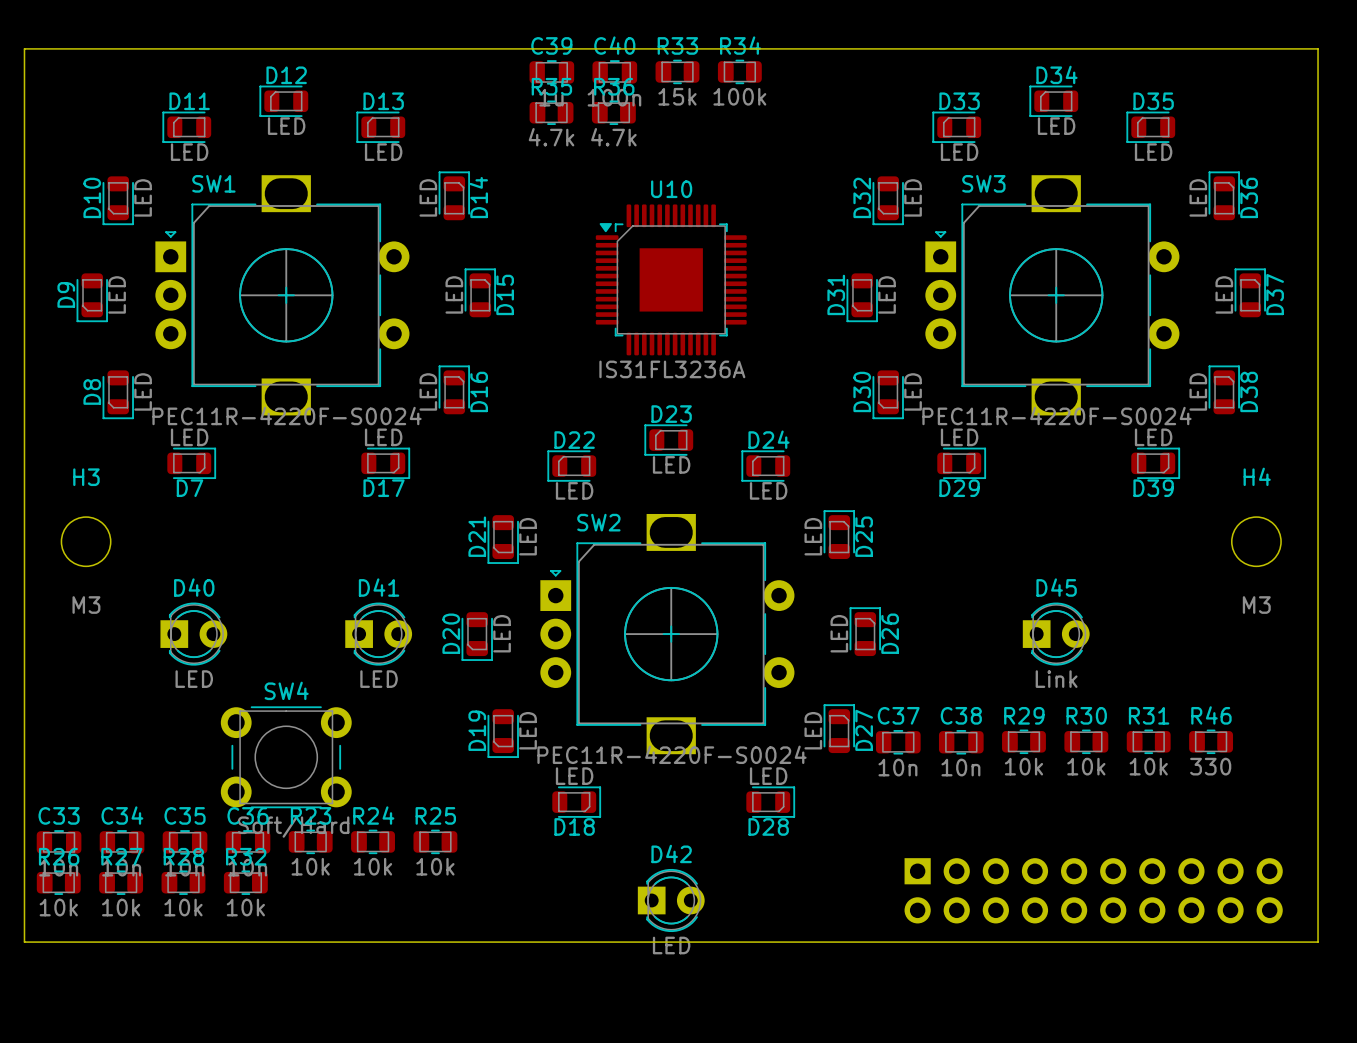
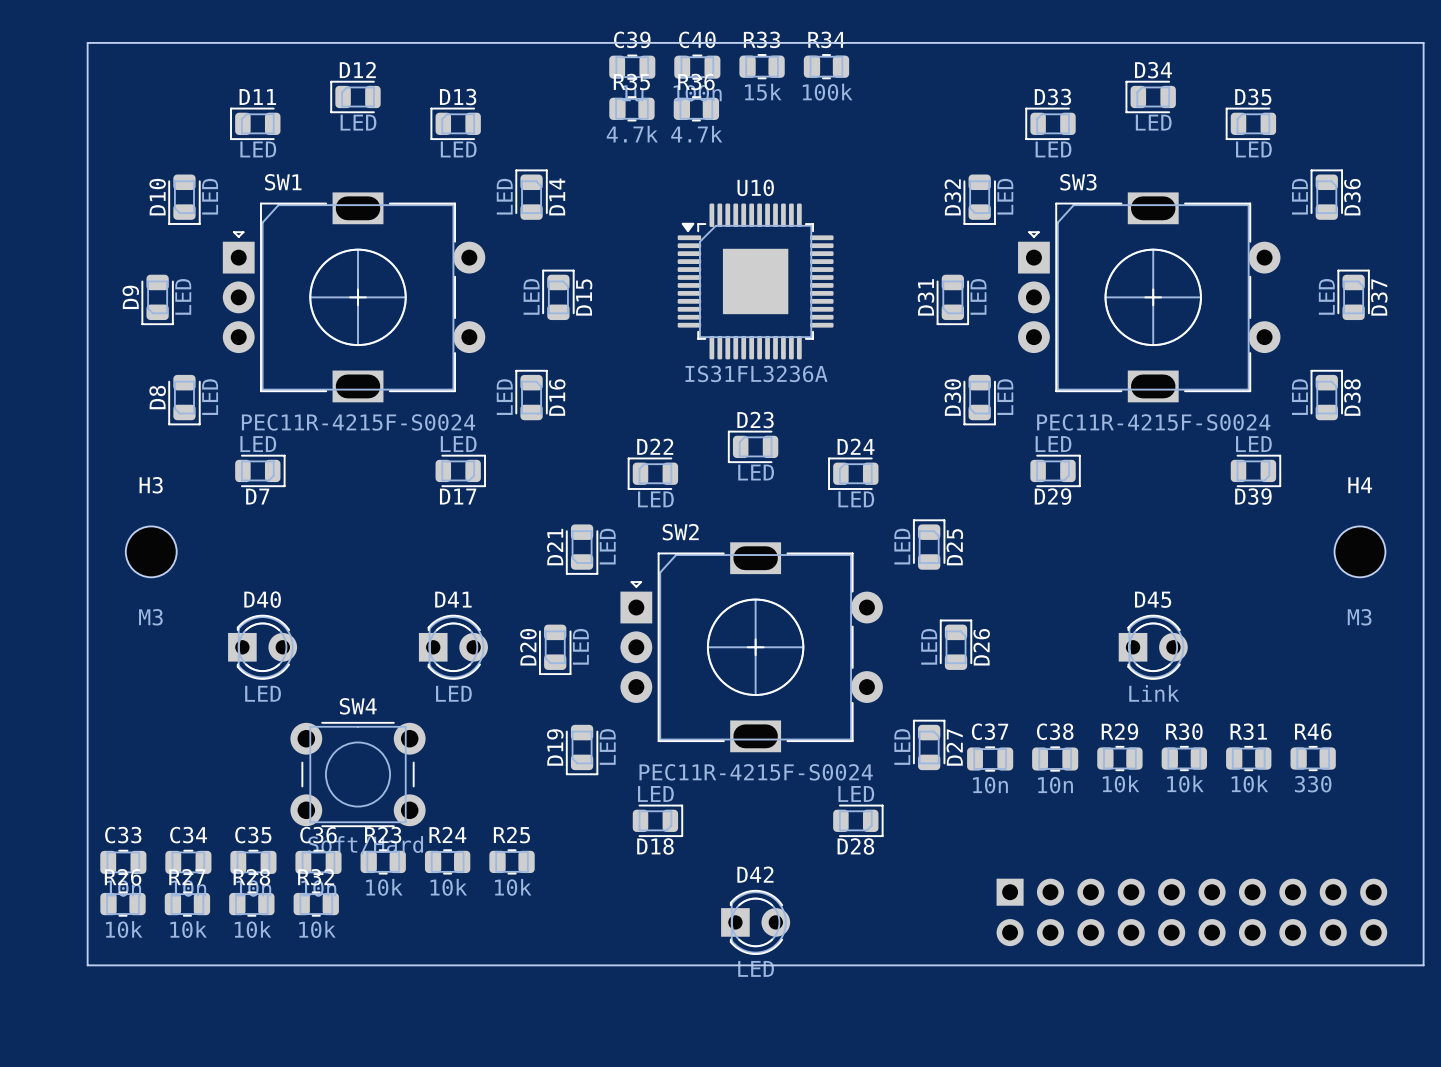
SW1 footprint: [155, 175, 410, 416] -> [222, 192, 486, 403]
SW3 footprint: [925, 175, 1180, 416] -> [1018, 192, 1281, 403]
SW1 value: PEC11R-4220F-S0024 (287, 416) -> PEC11R-4215F-S0024 (358, 422)
SW3 value: PEC11R-4220F-S0024 (1056, 416) -> PEC11R-4215F-S0024 (1153, 422)
SW2 footprint: [540, 513, 795, 755] -> [620, 542, 883, 753]
SW2 value: PEC11R-4220F-S0024 (671, 754) -> PEC11R-4215F-S0024 (756, 772)

